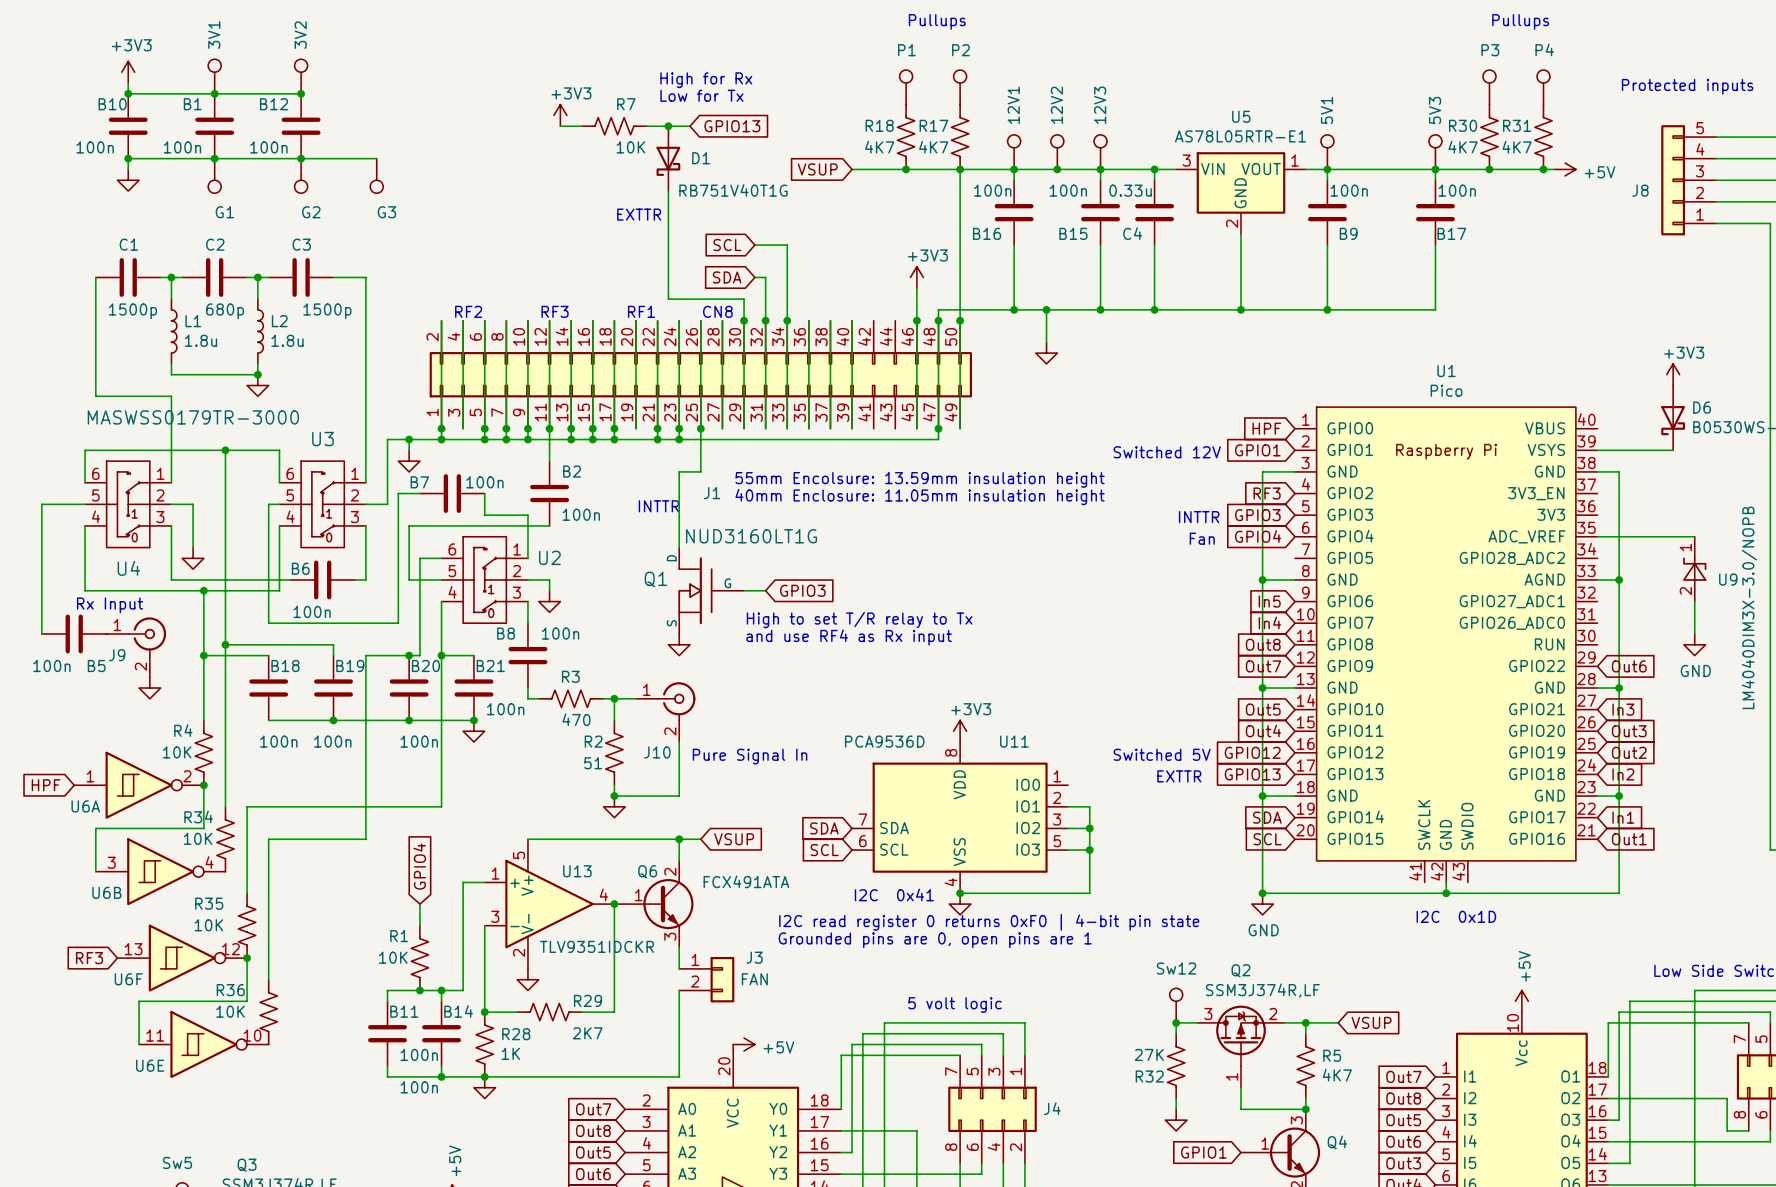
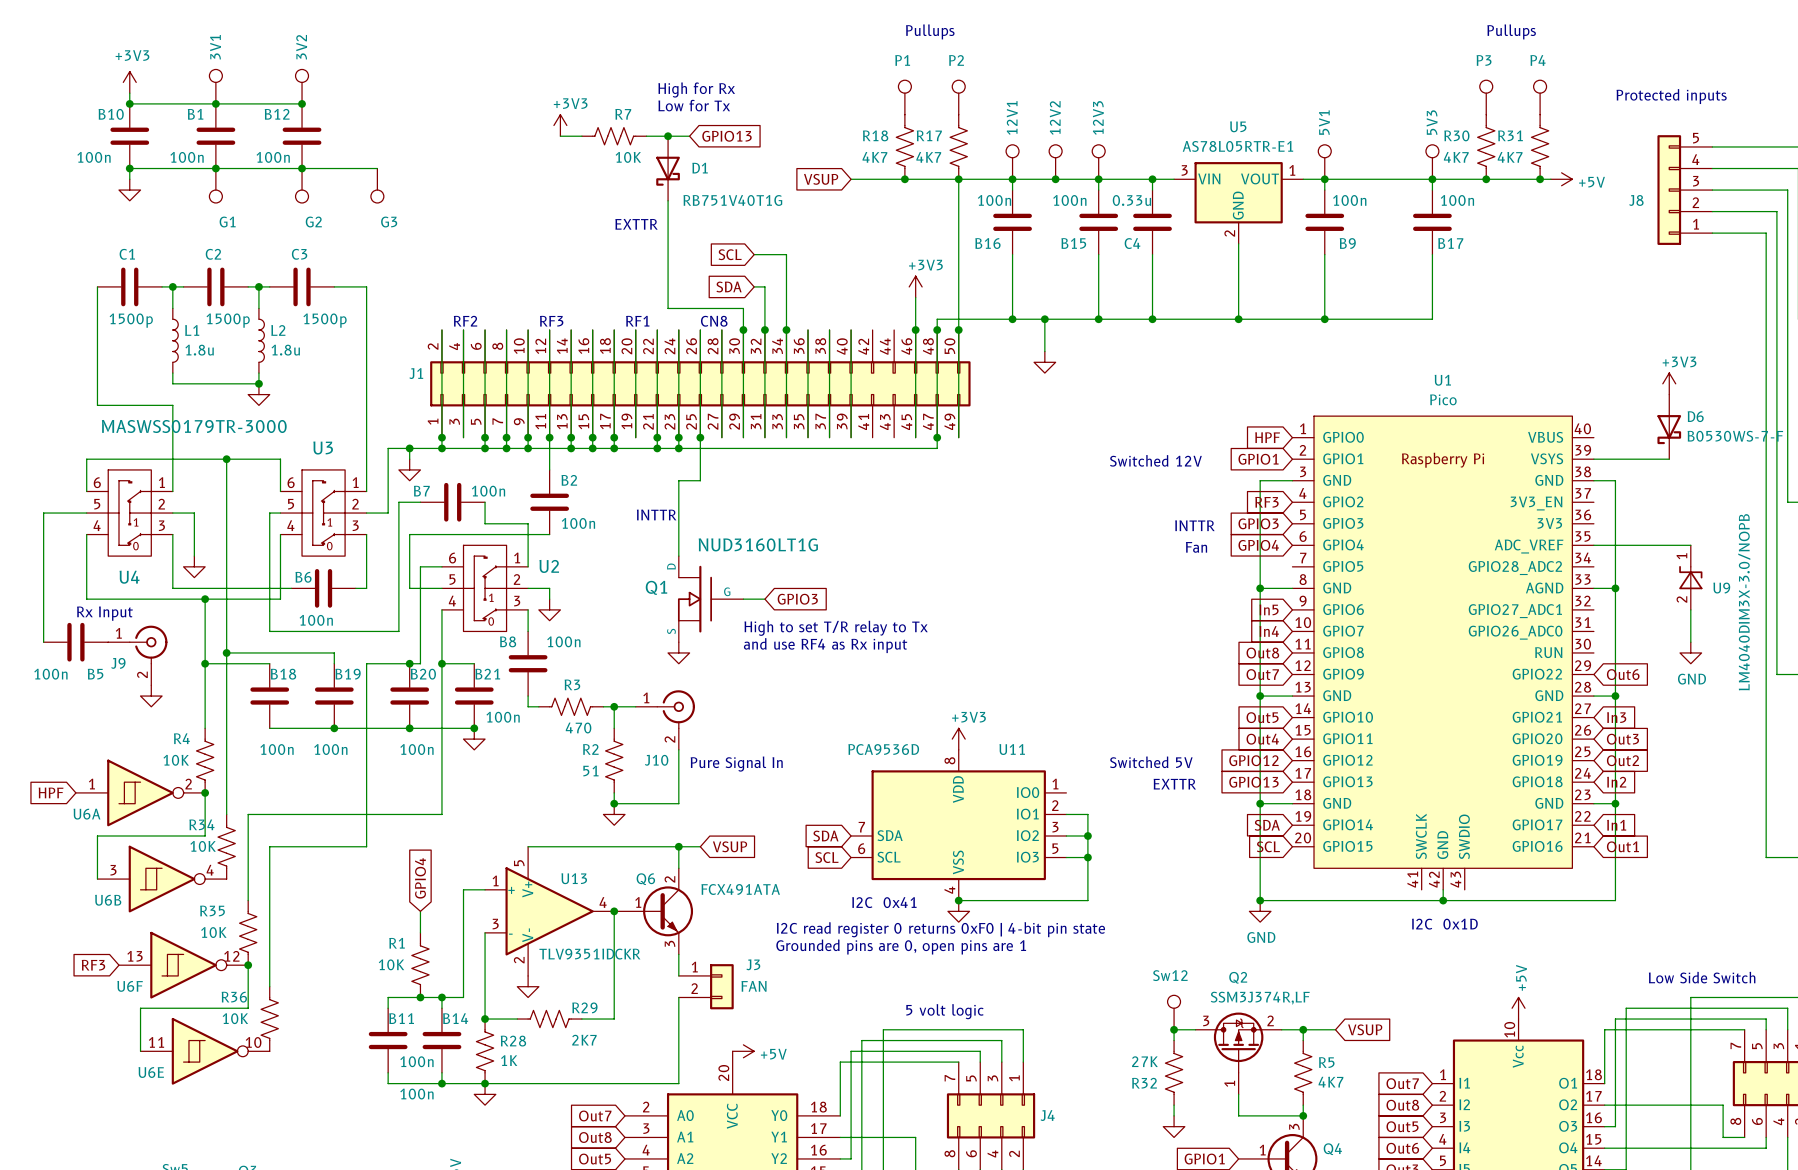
C2 value: 680p (225, 311) -> 1500p (228, 320)
text: 55mm Encolsure: 13.59mm insulation height (920, 479) -> none
J1 name position: J1 (712, 493) -> J1 (416, 373)
text: 40mm Enclosure: 11.05mm insulation height (920, 497) -> none

